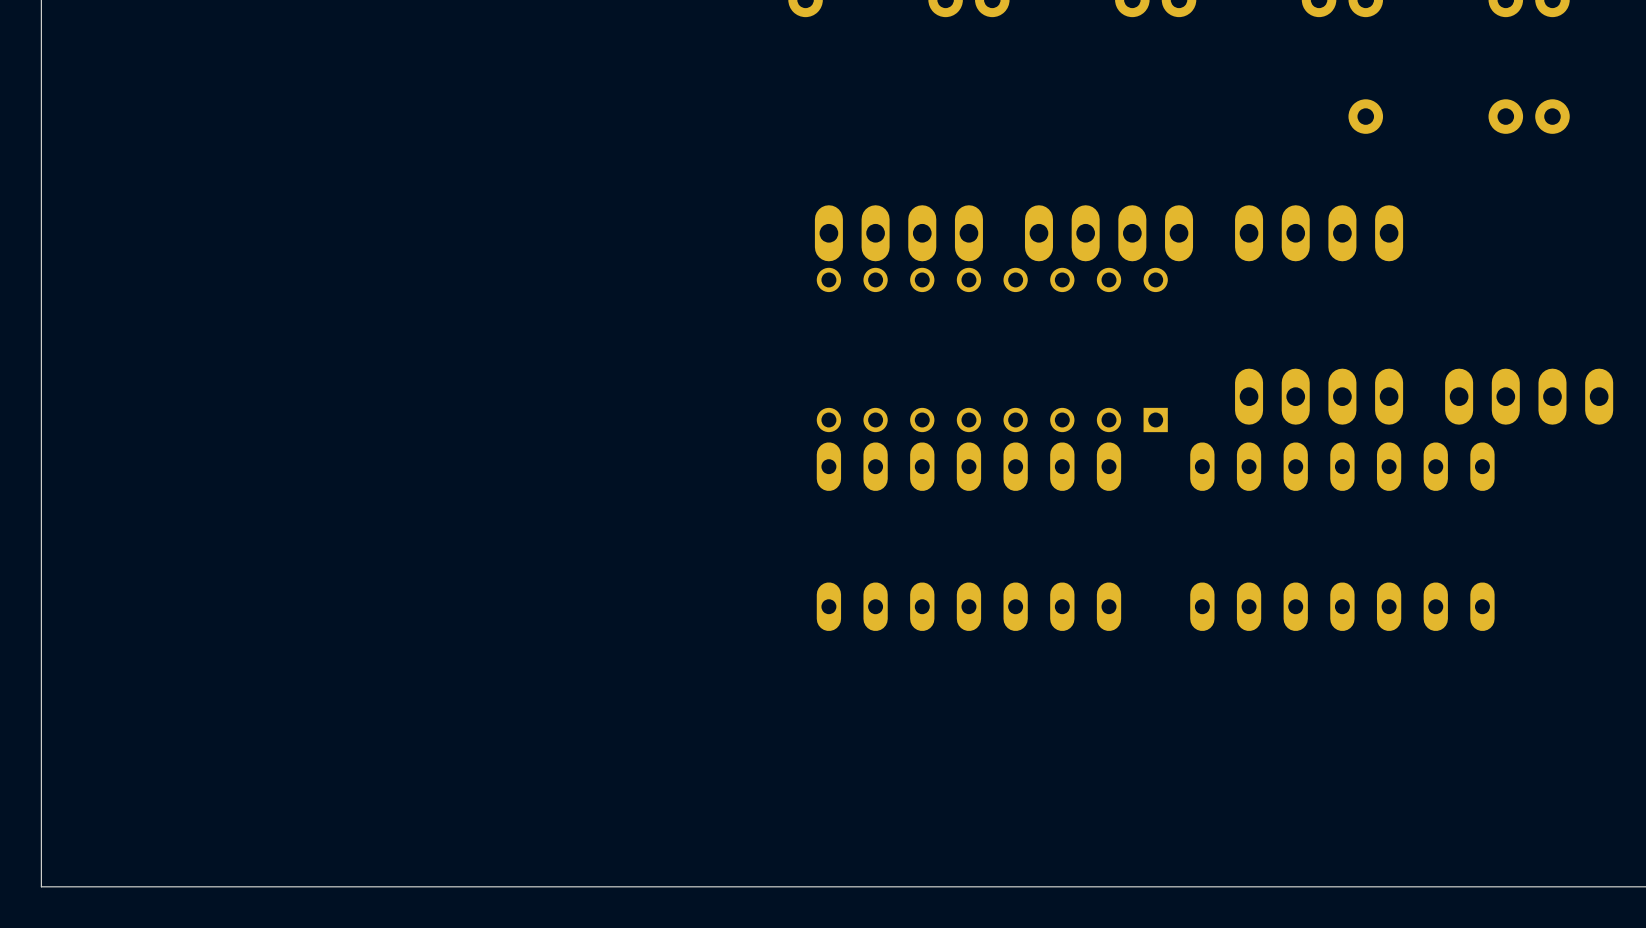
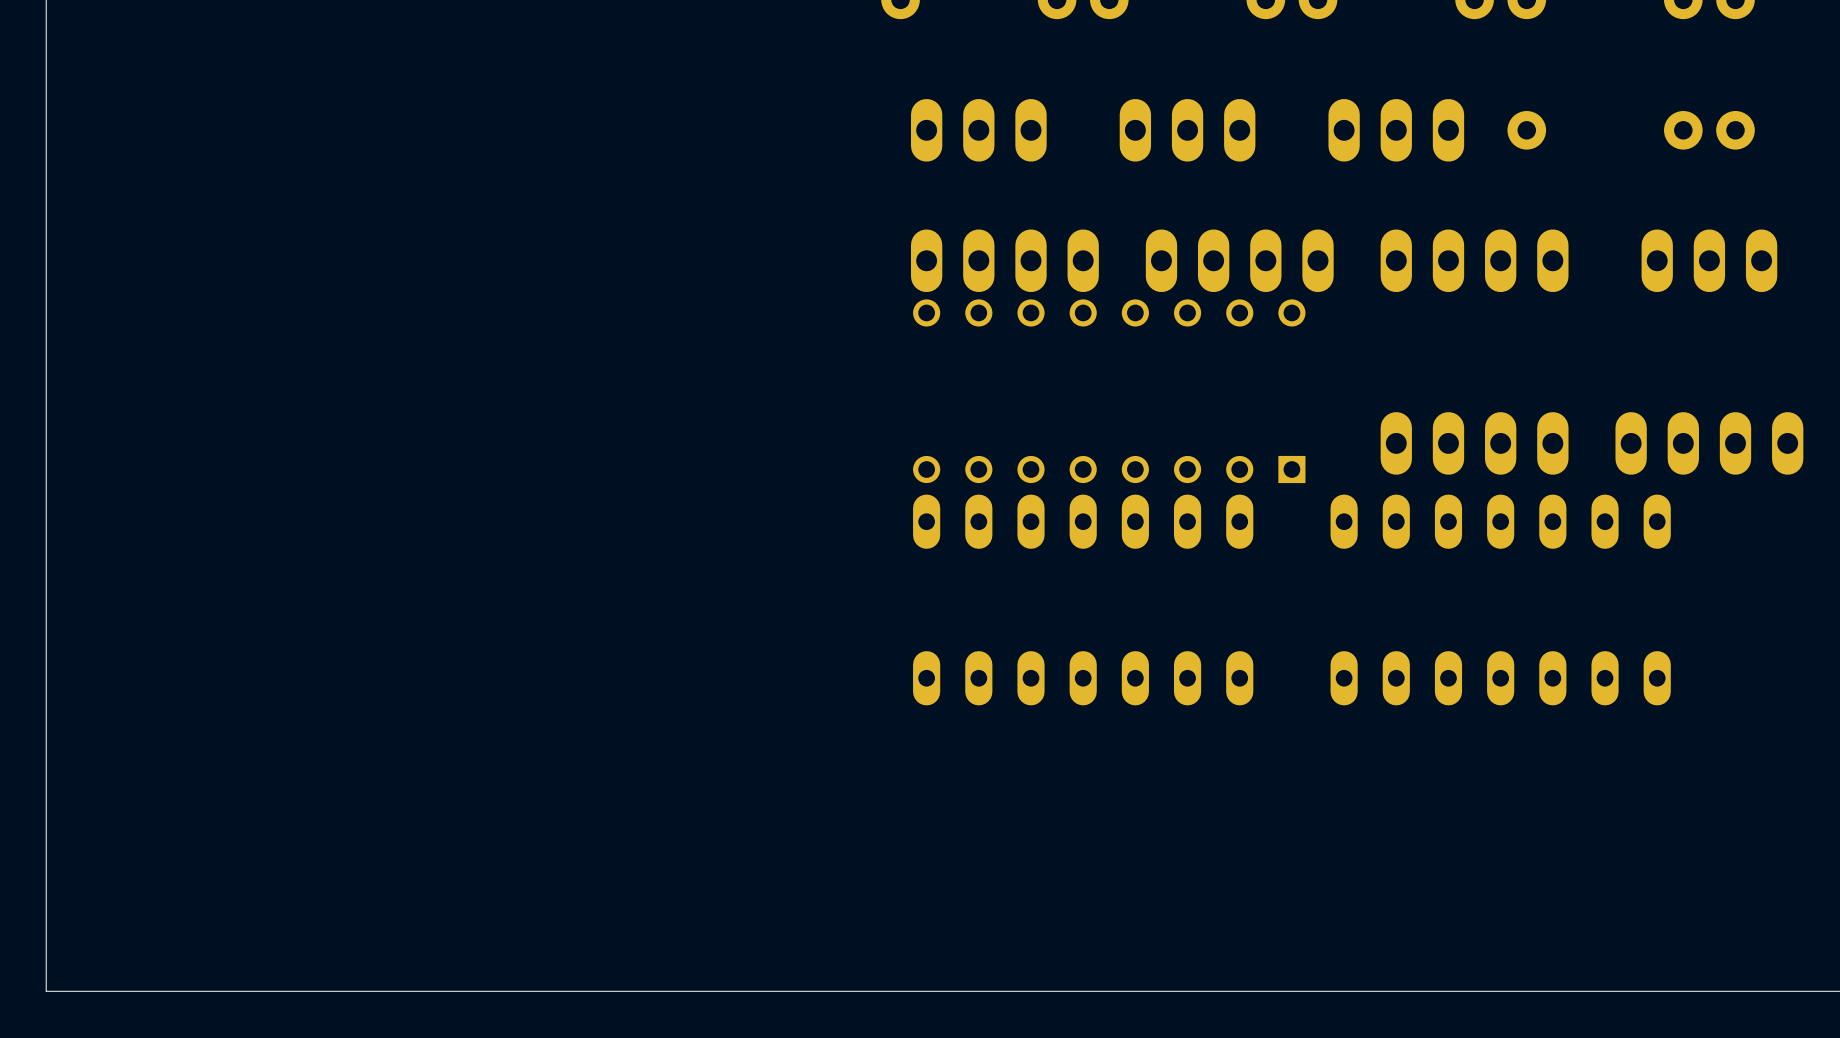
part: none -> (978, 130)
part: none -> (1187, 130)
part: none -> (1396, 130)
part: none -> (1709, 260)

